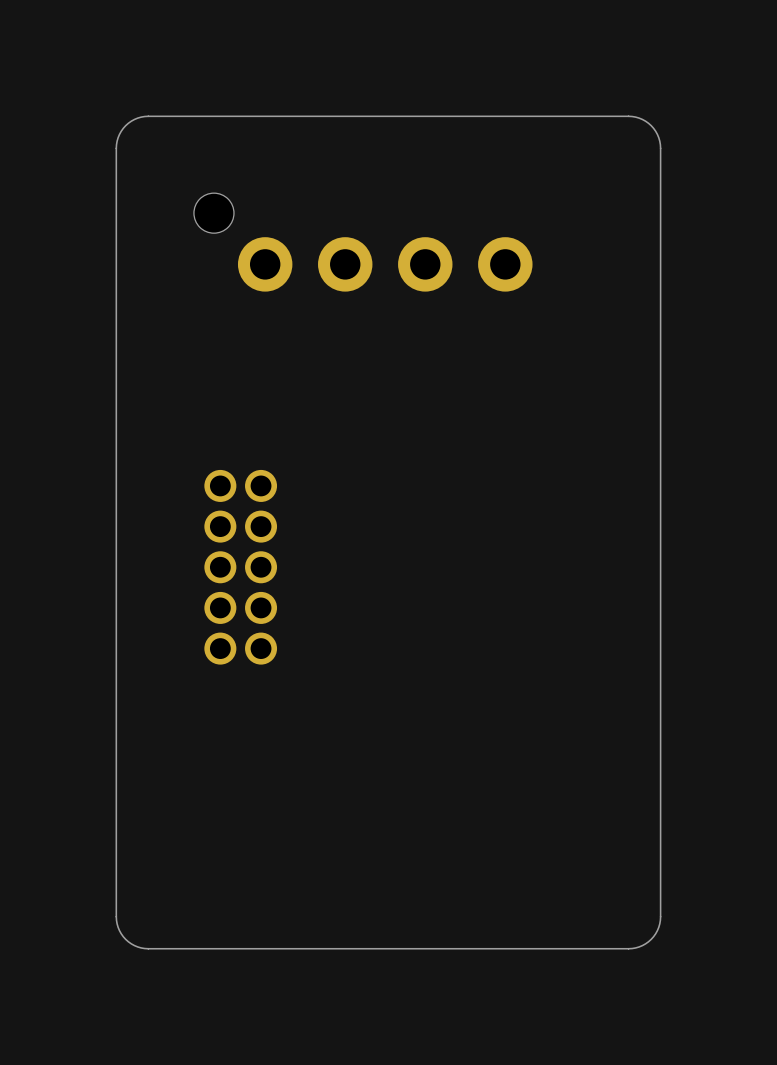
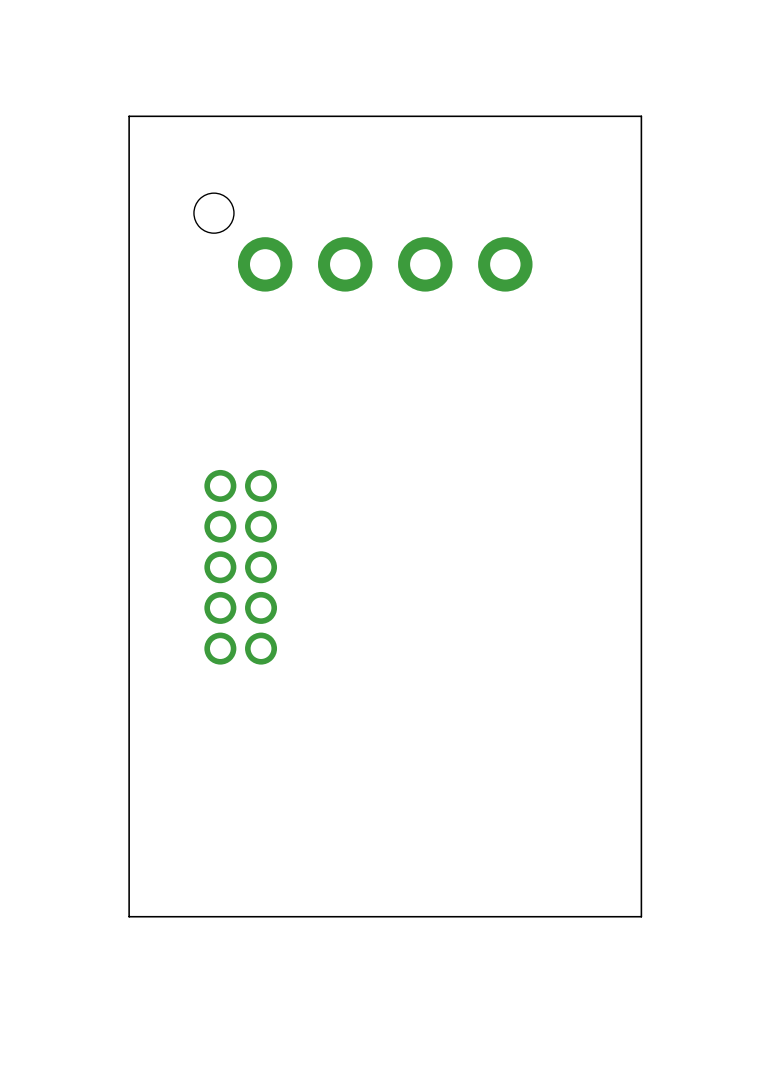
board edge: (628, 116) (642, 119) (651, 125) (658, 137) (660, 148) (660, 916) (657, 930) (651, 939) (642, 945) (628, 948) (148, 948) (131, 943) (121, 933) (116, 916) (116, 148) (119, 134) (125, 125) (134, 119) (148, 116) -> (628, 116) (641, 116) (641, 916) (129, 916) (129, 116) (148, 116)

